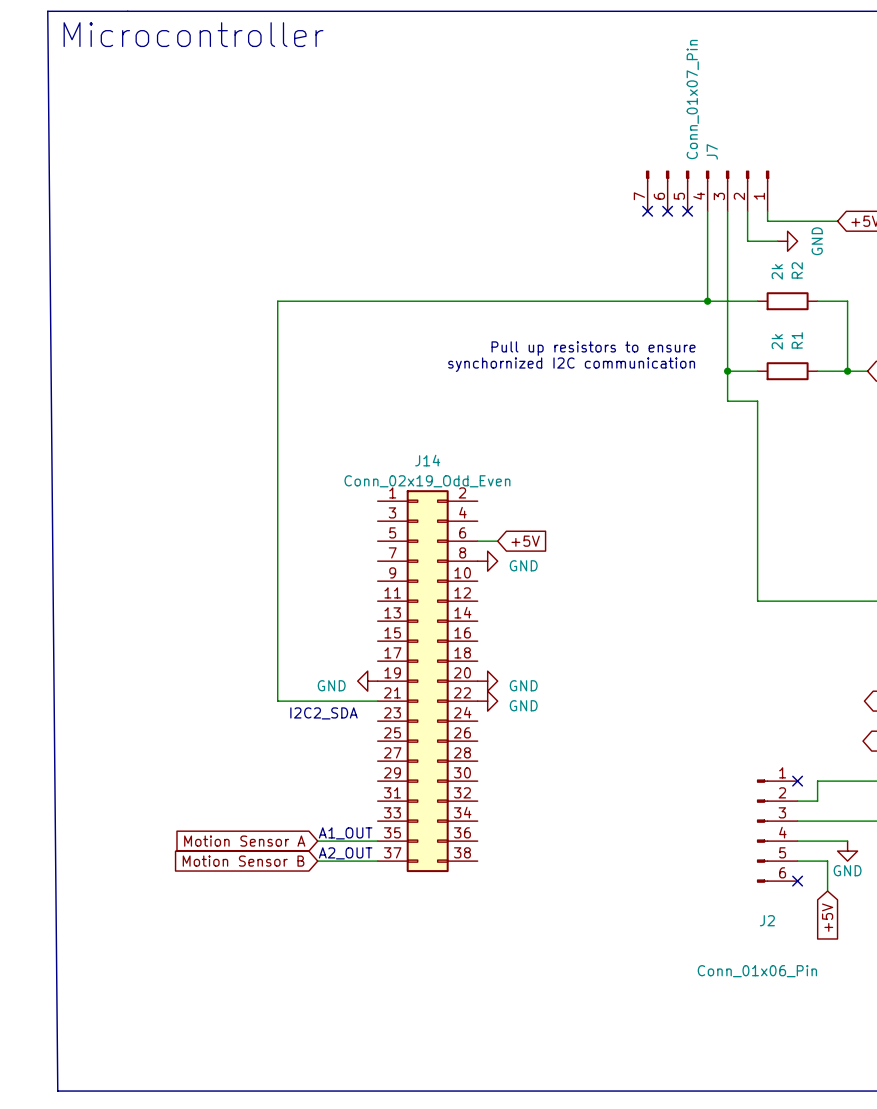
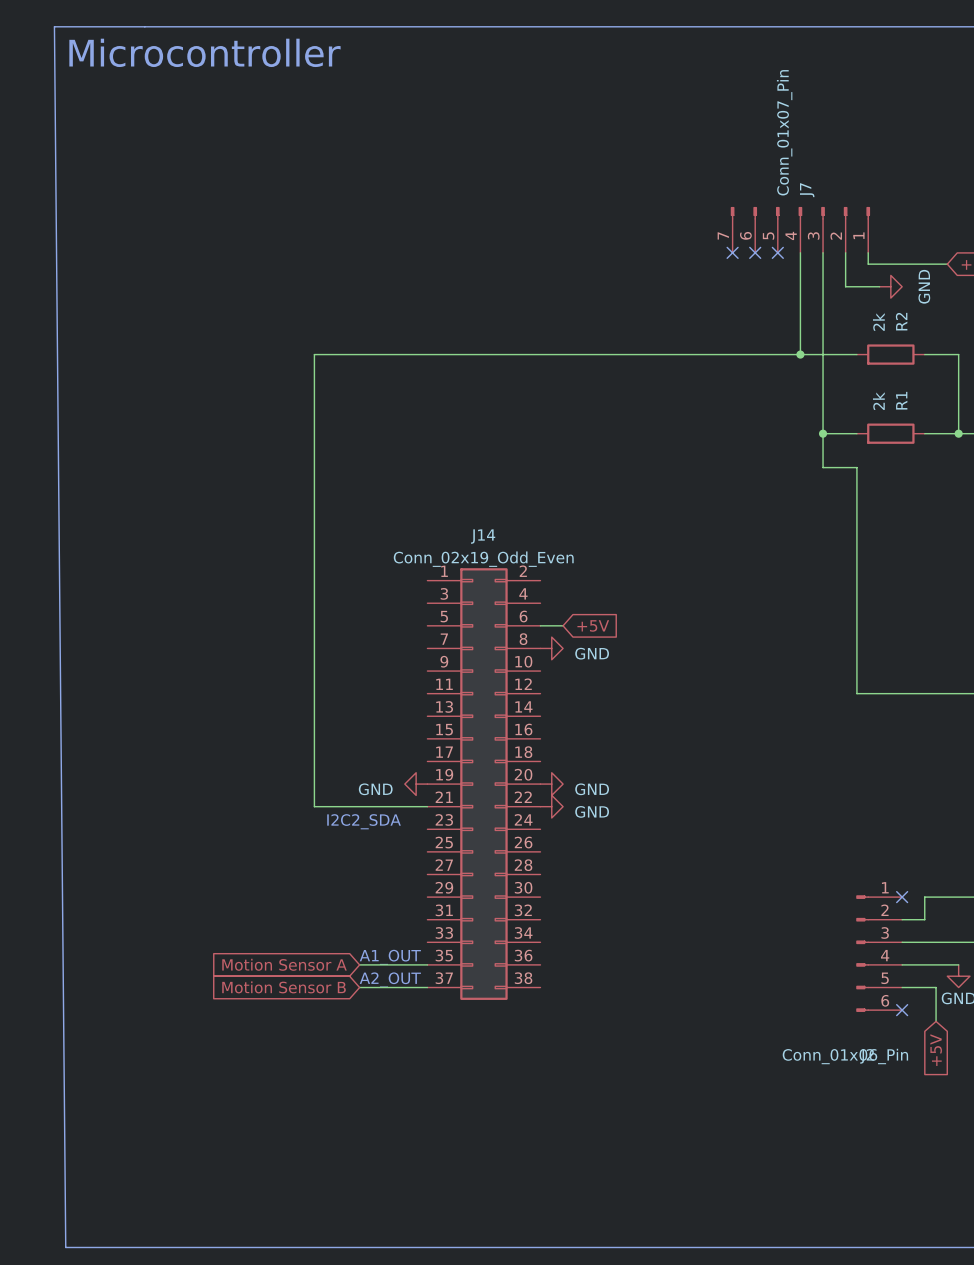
text: Pull up resistors to ensure (593, 348) -> none
text: synchornized I2C communication (571, 364) -> none
J2 value position: Conn_01x06_Pin (757, 971) -> Conn_01x06_Pin (845, 1056)

